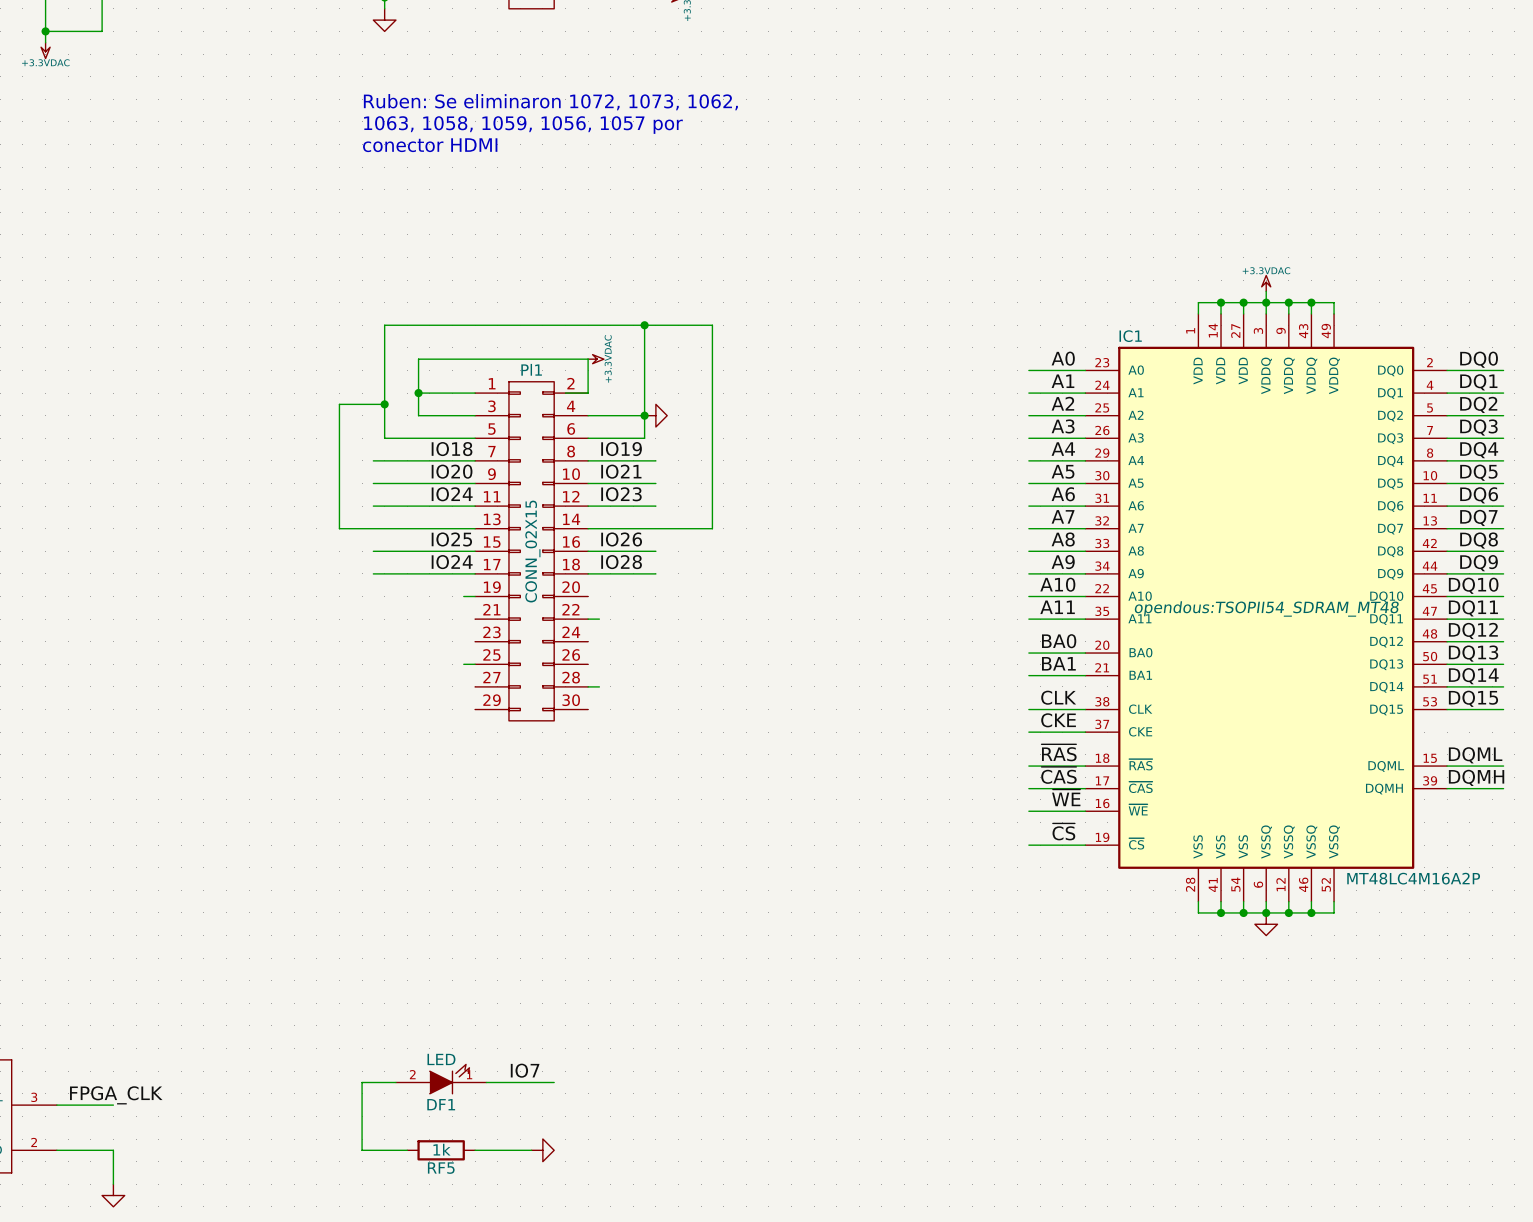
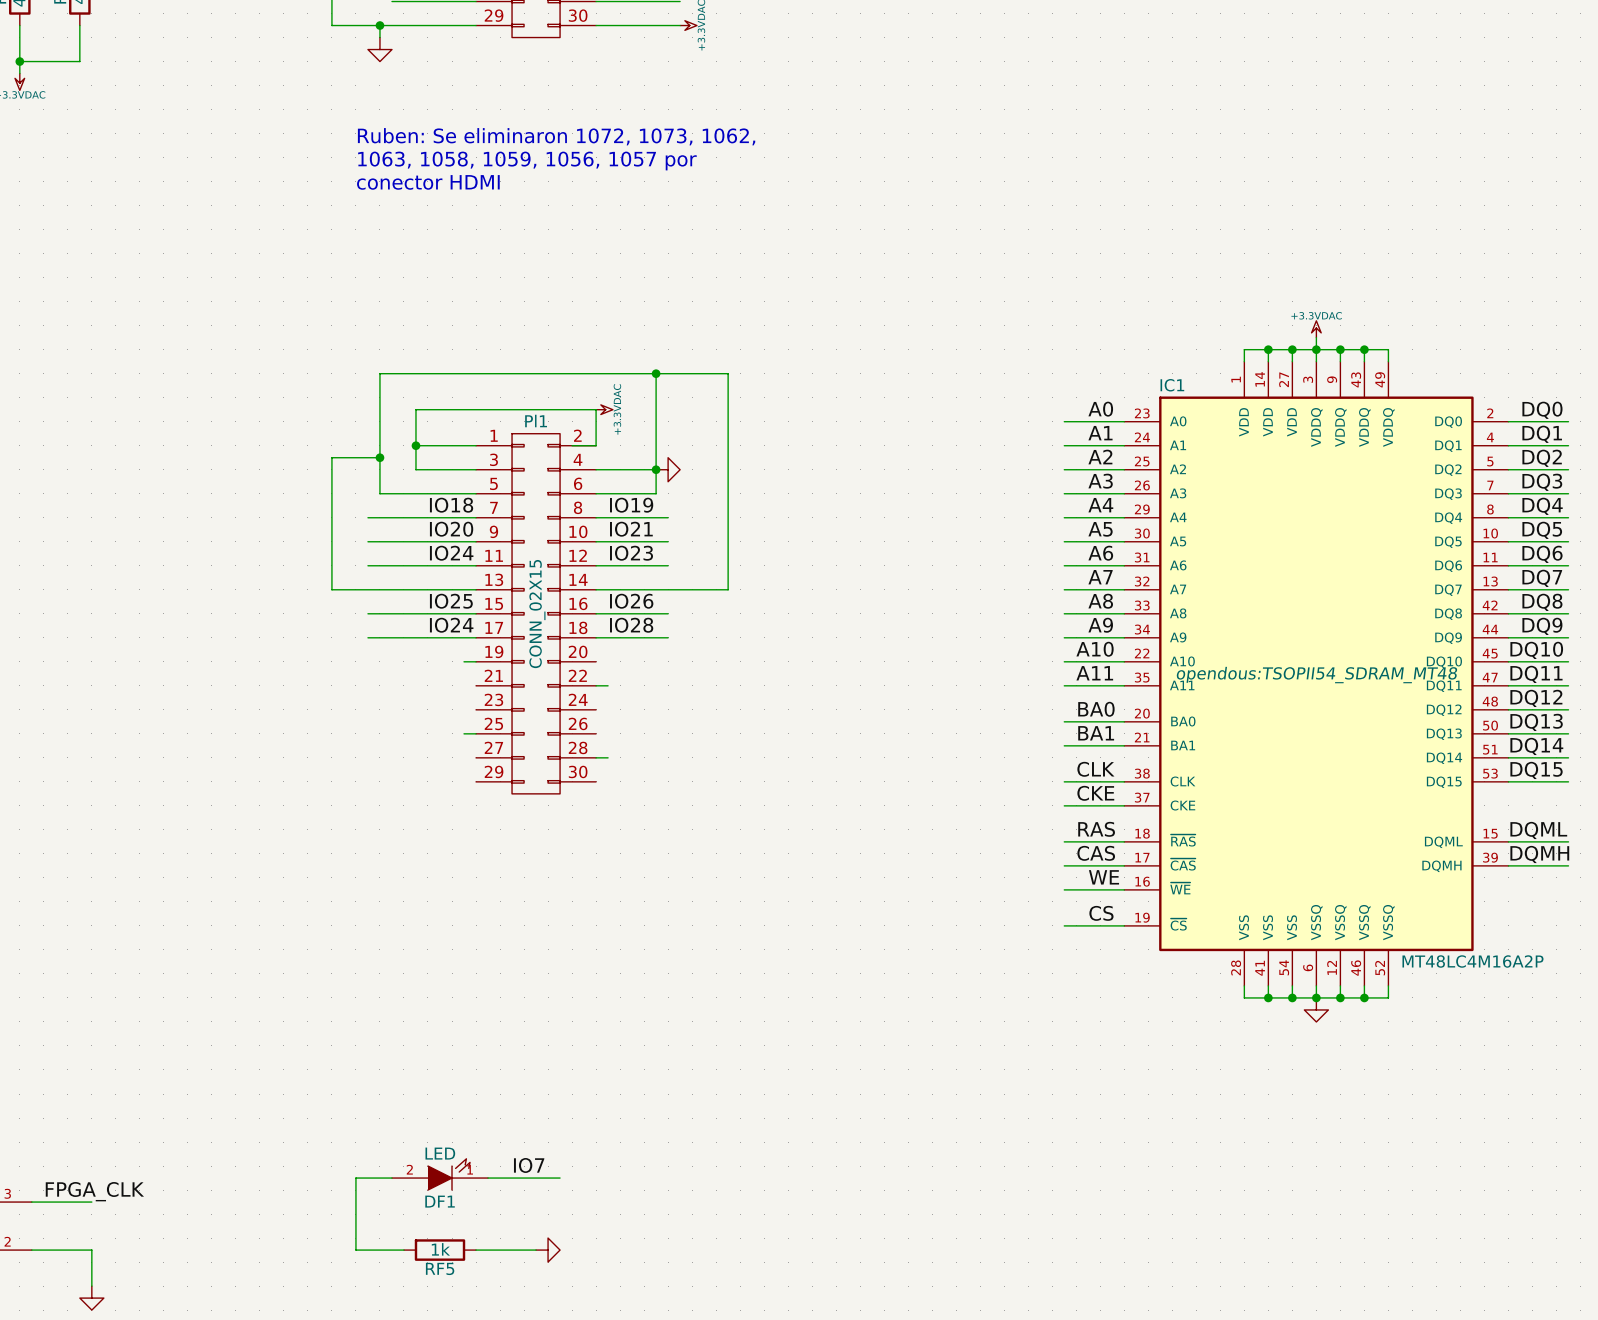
label: ~{RAS} (1059, 752) -> RAS (1096, 829)
label: ~{CAS} (1058, 775) -> CAS (1096, 853)
label: ~{WE} (1066, 797) -> WE (1103, 877)
label: ~{CS} (1063, 831) -> CS (1101, 913)

